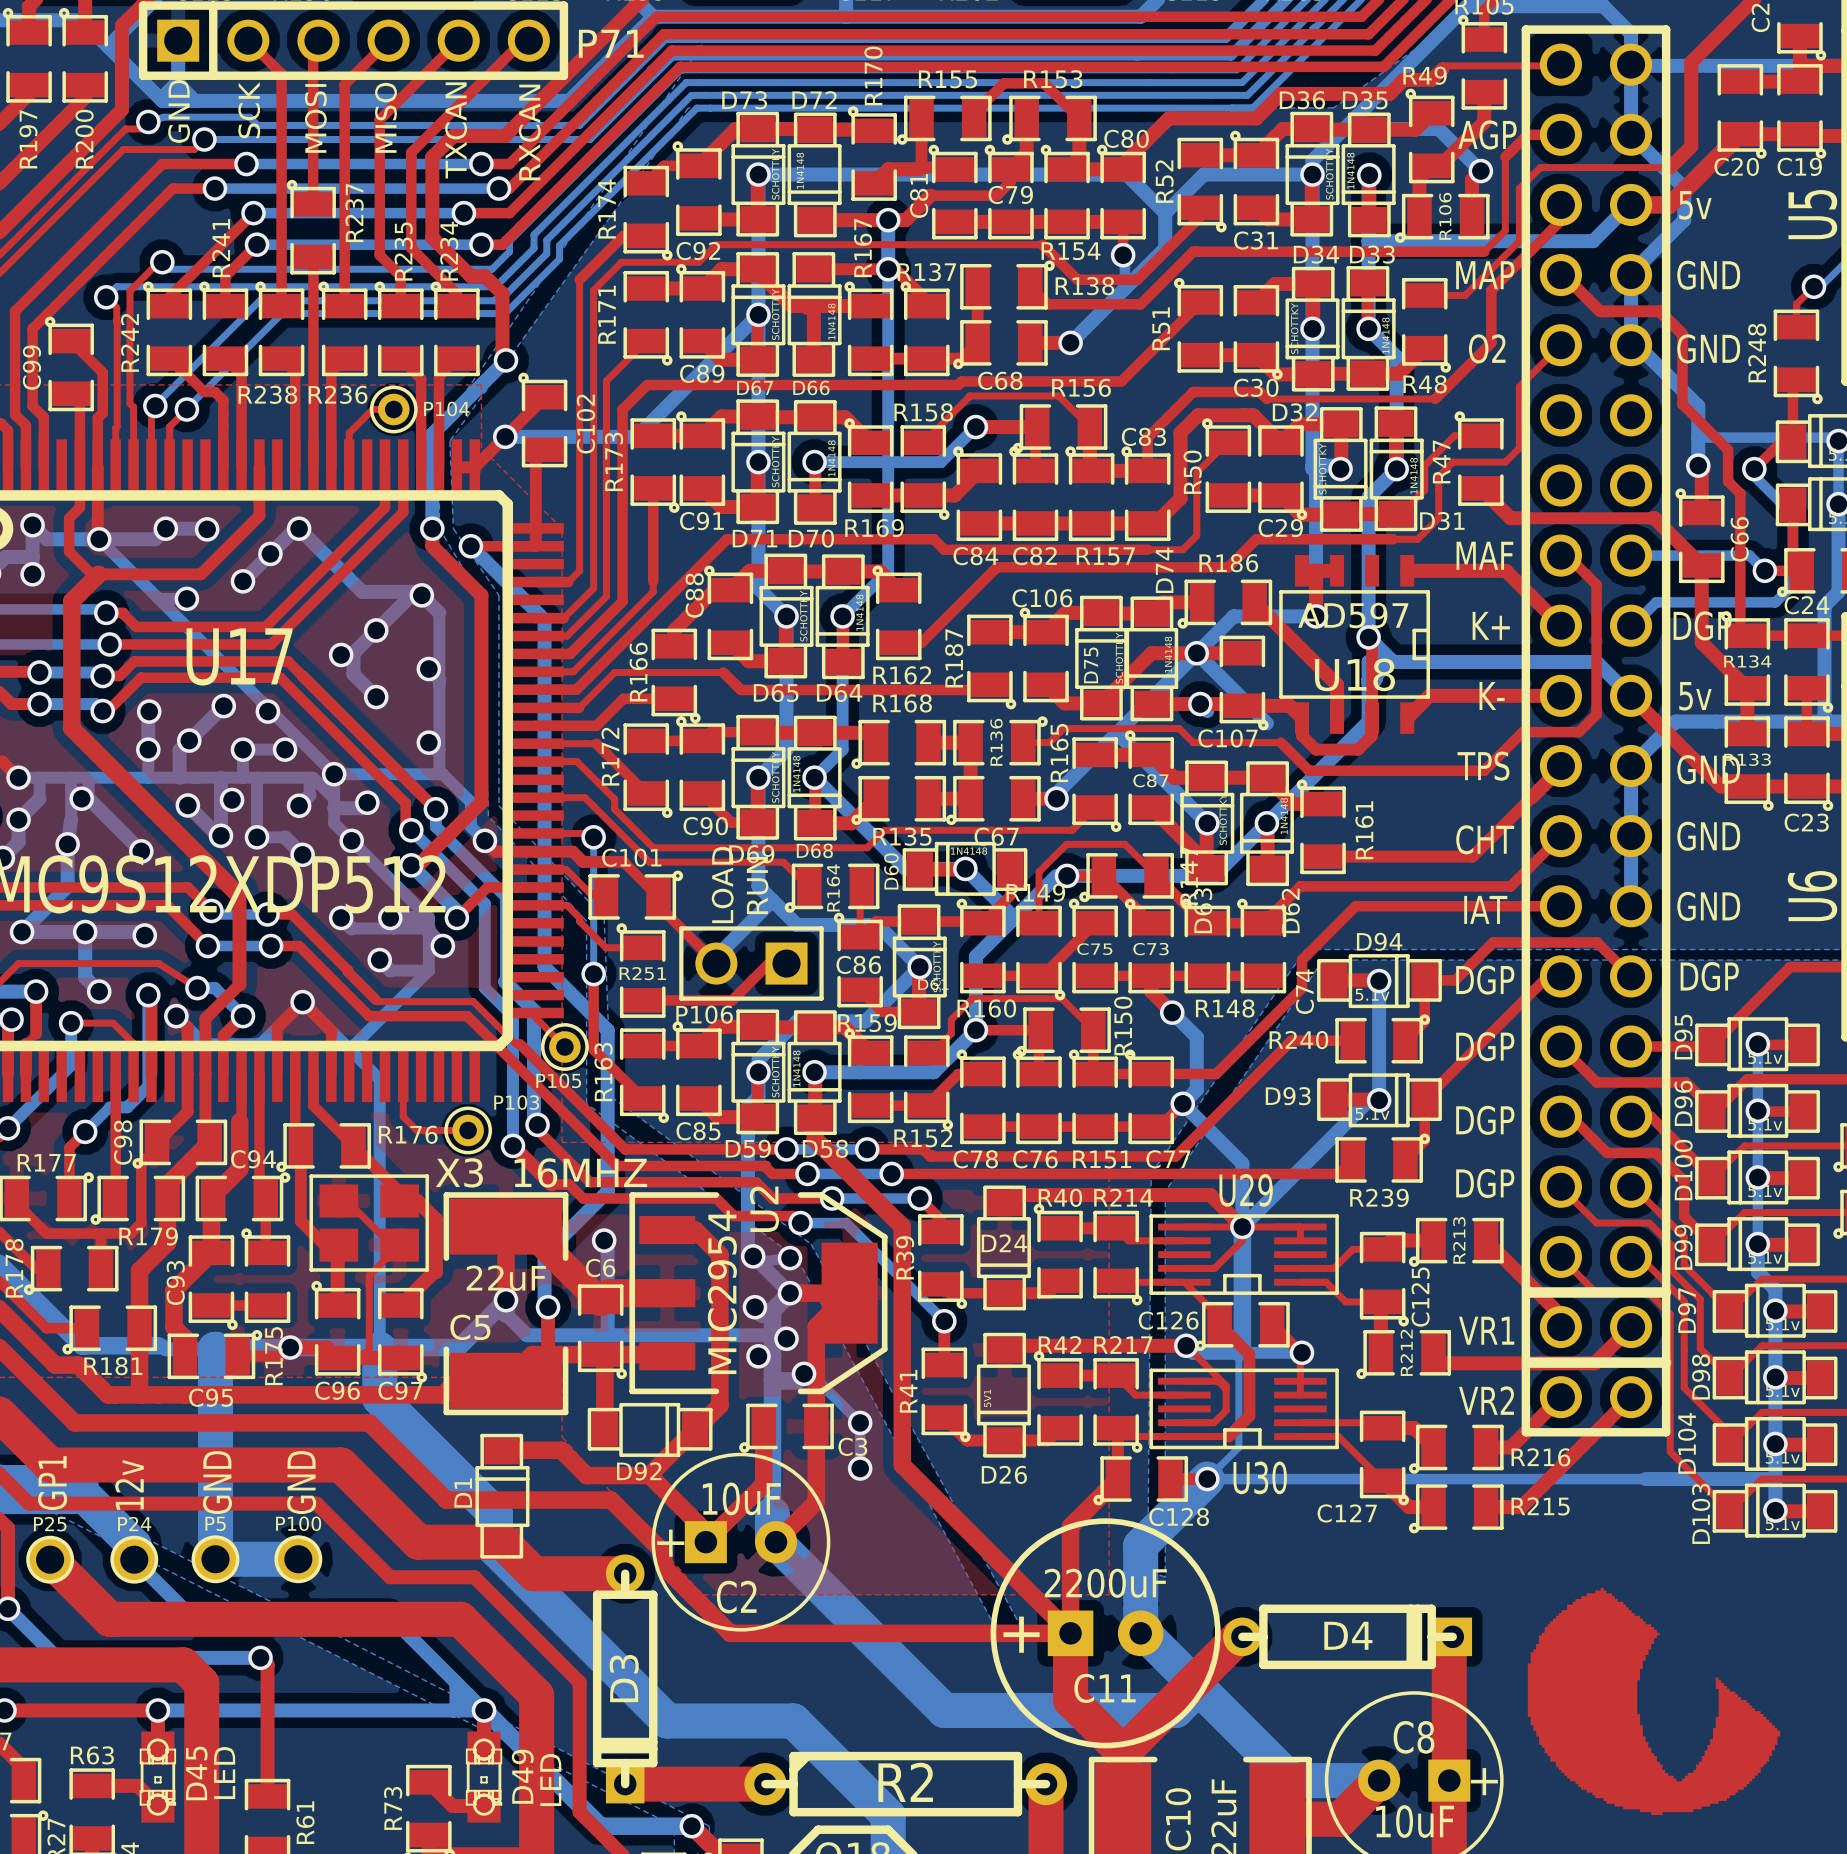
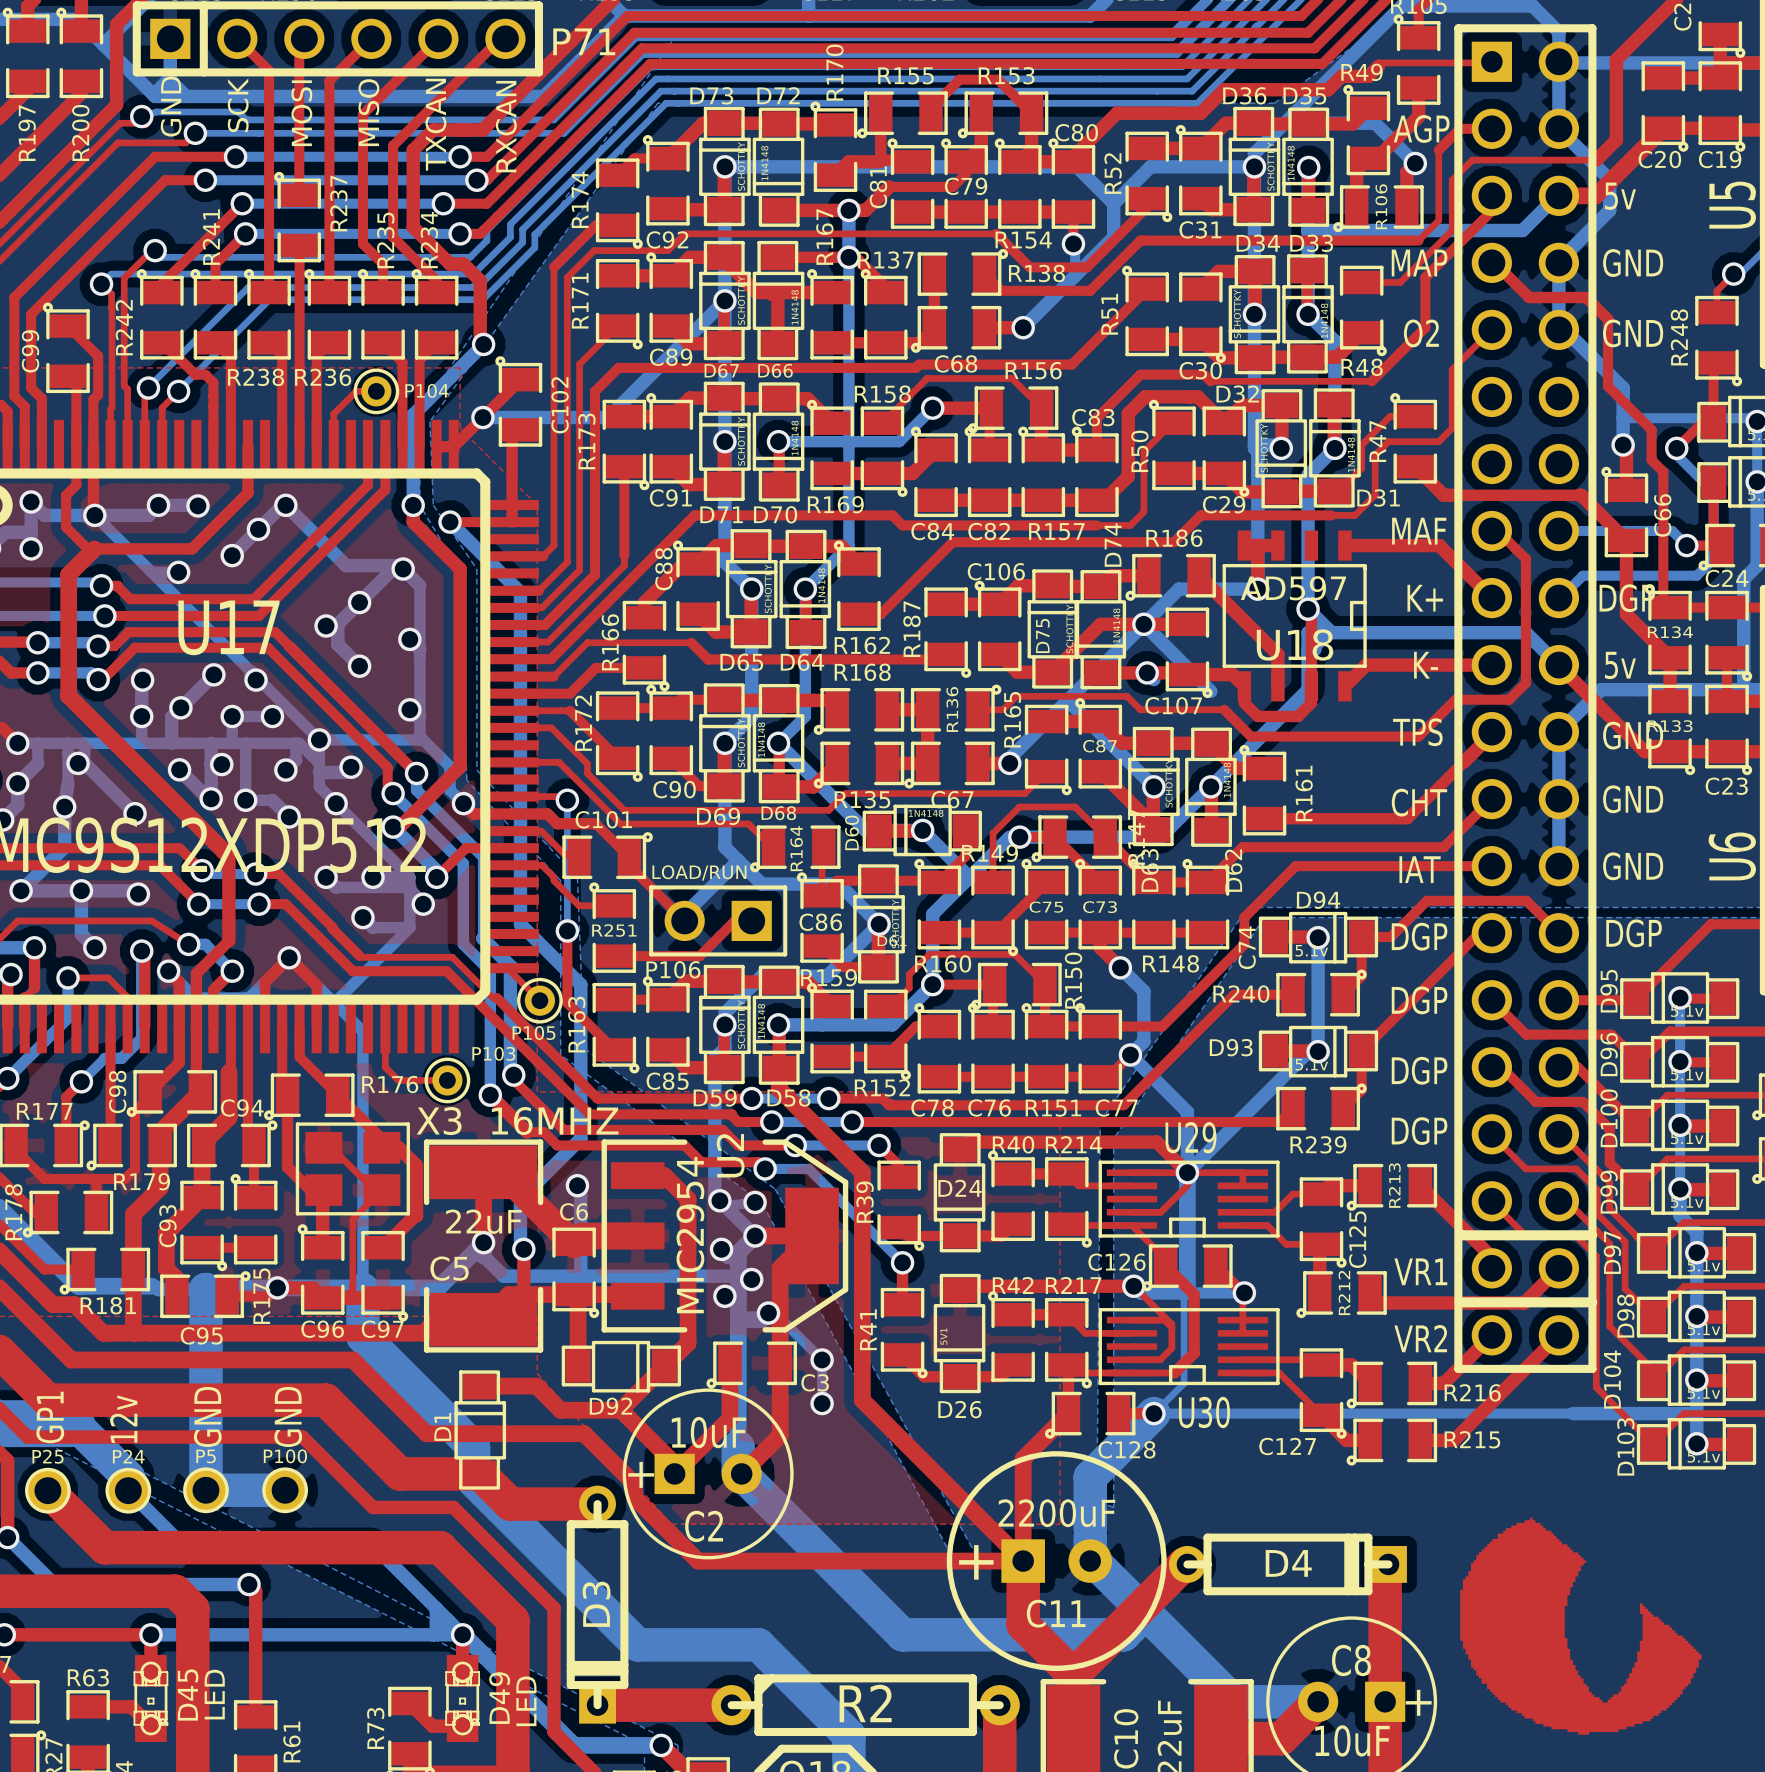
part footprint: [1521, 25, 1671, 1437] -> [1454, 24, 1597, 1373]
text: LOAD (722, 885) -> LOAD/RUN (699, 872)
text: RUN (757, 885) -> none

